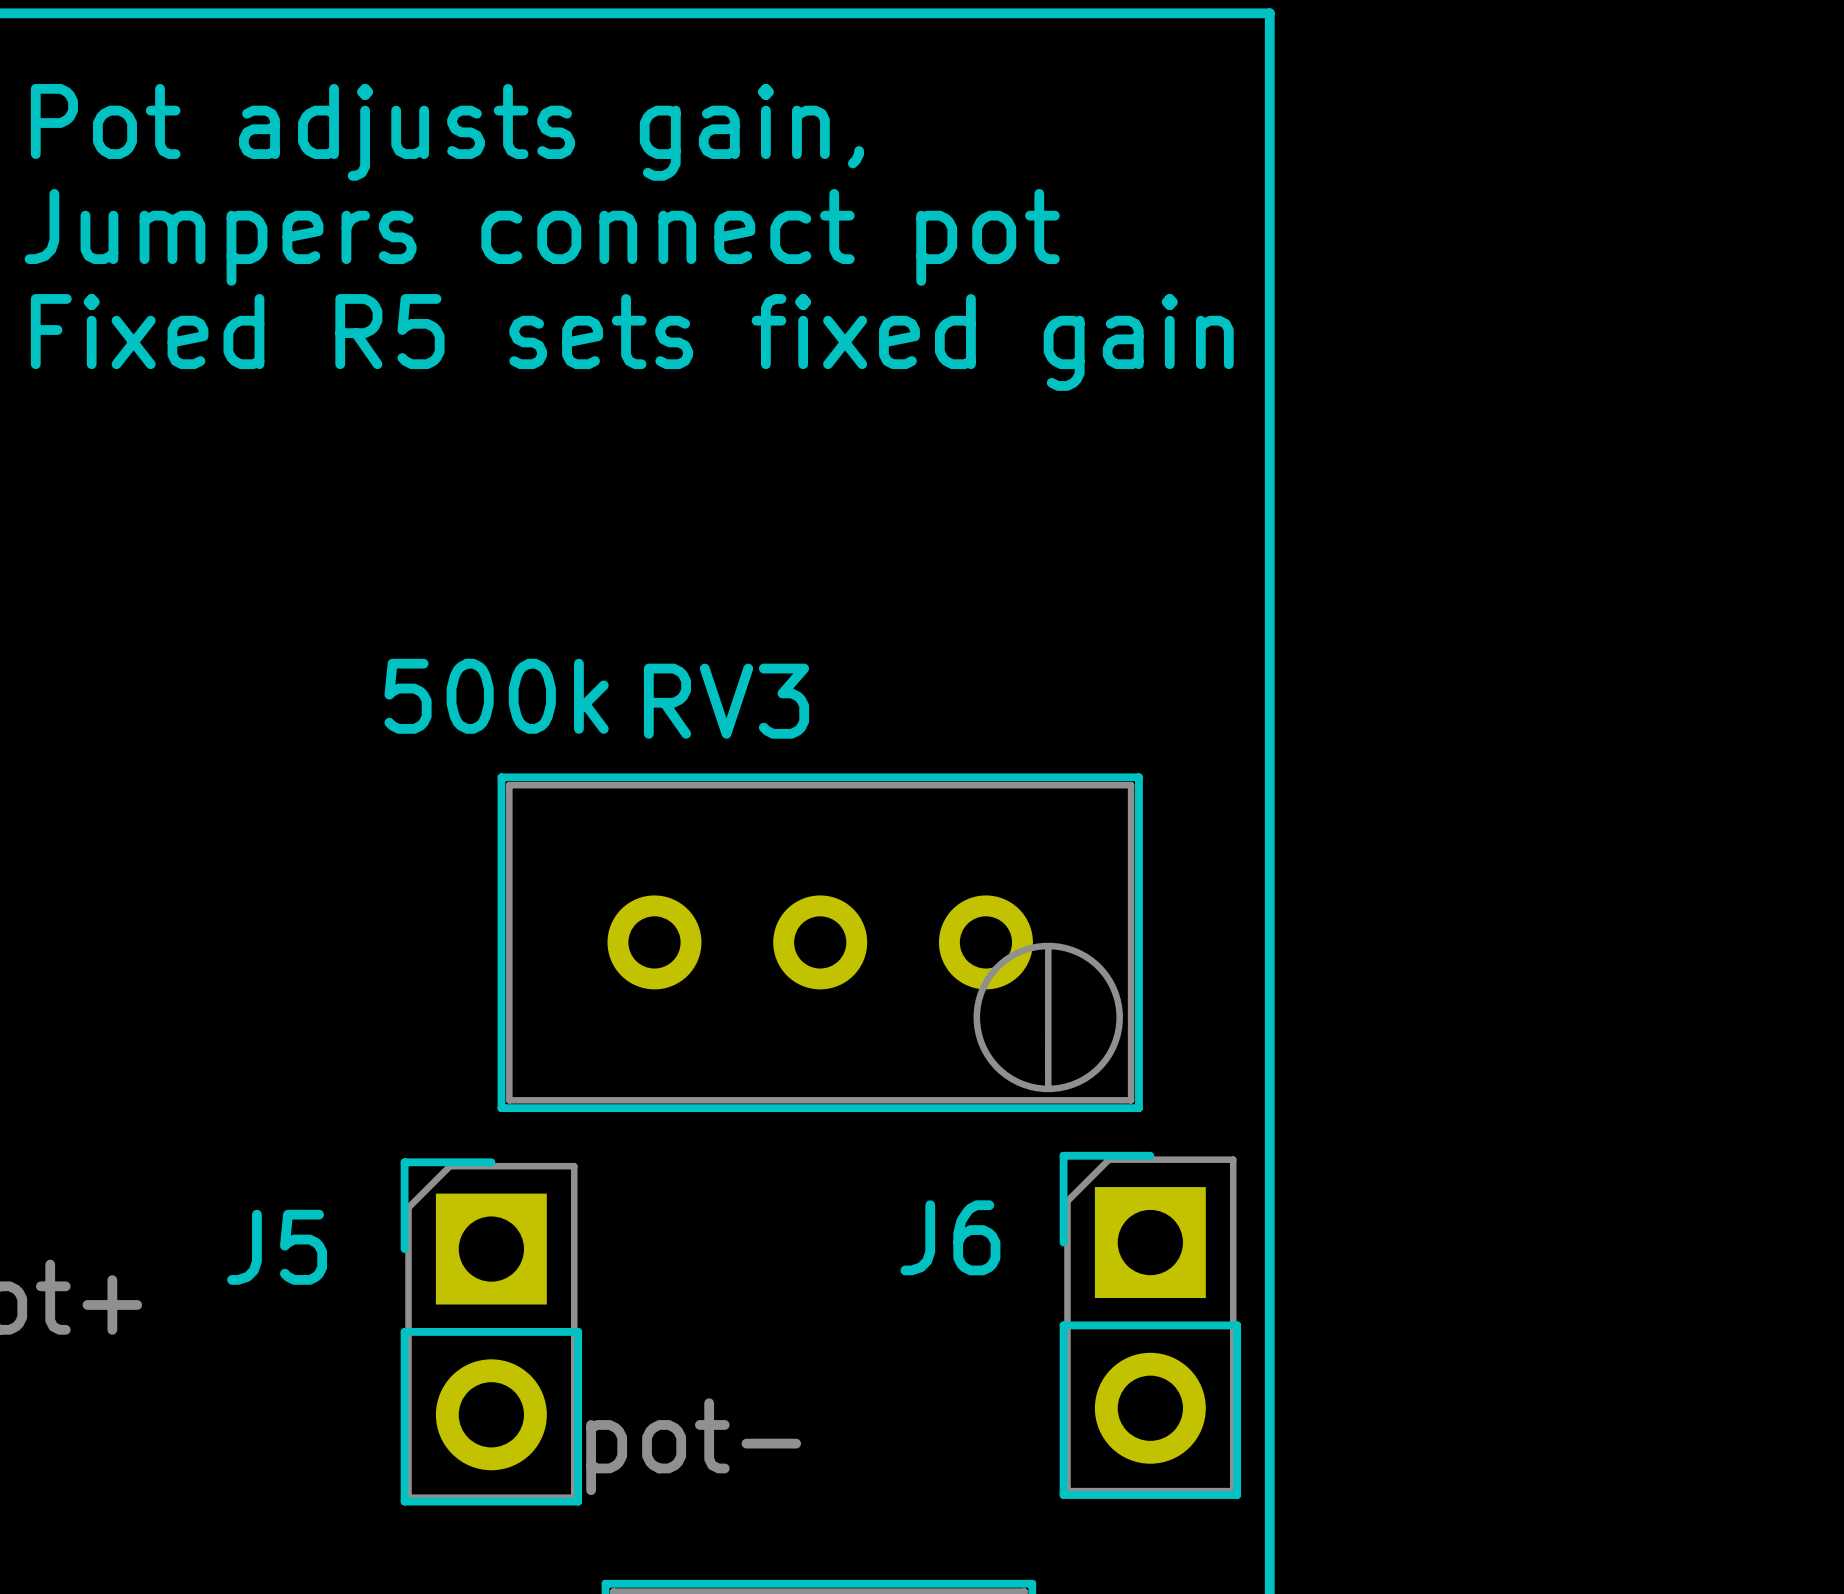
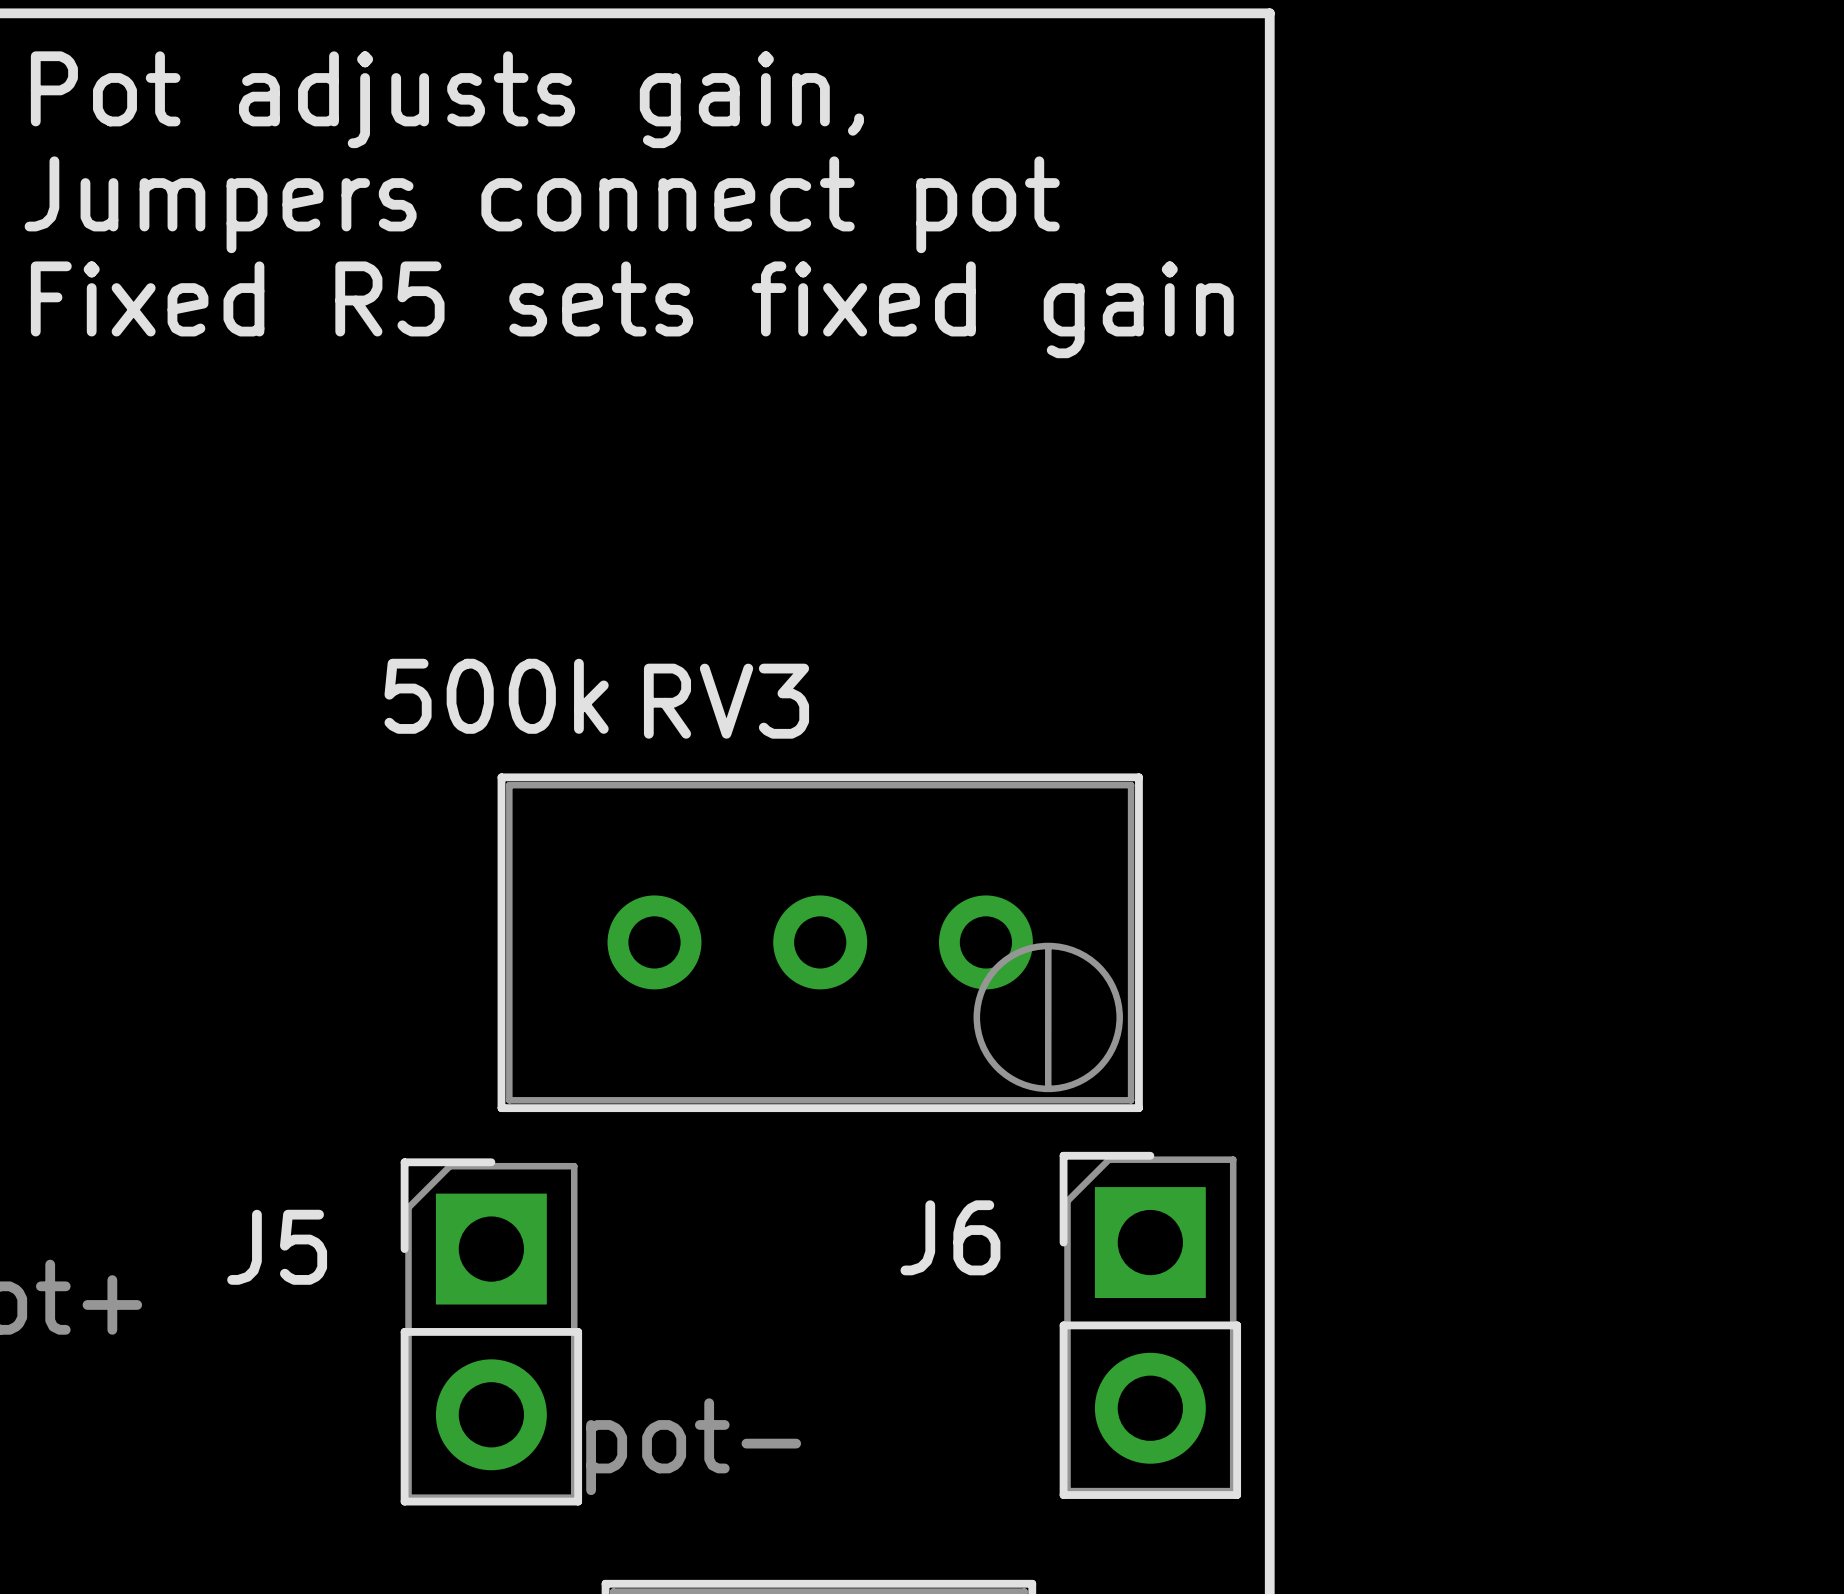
text position: Pot adjusts gain, (447, 132) -> Pot adjusts gain, (447, 99)
text position: Jumpers connect pot (542, 237) -> Jumpers connect pot (542, 204)
text position: Fixed R5 sets fixed gain (632, 342) -> Fixed R5 sets fixed gain (632, 309)

